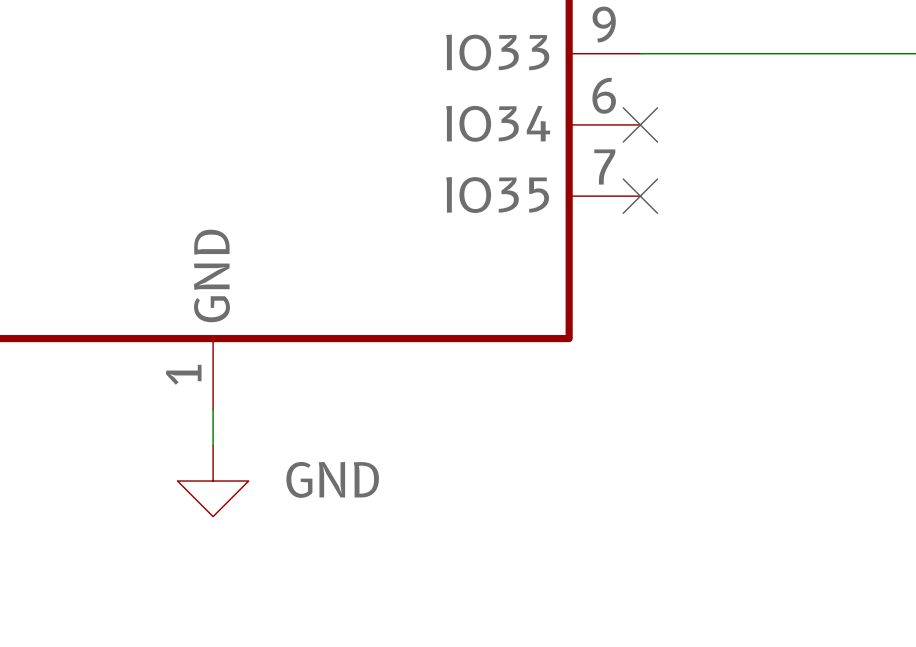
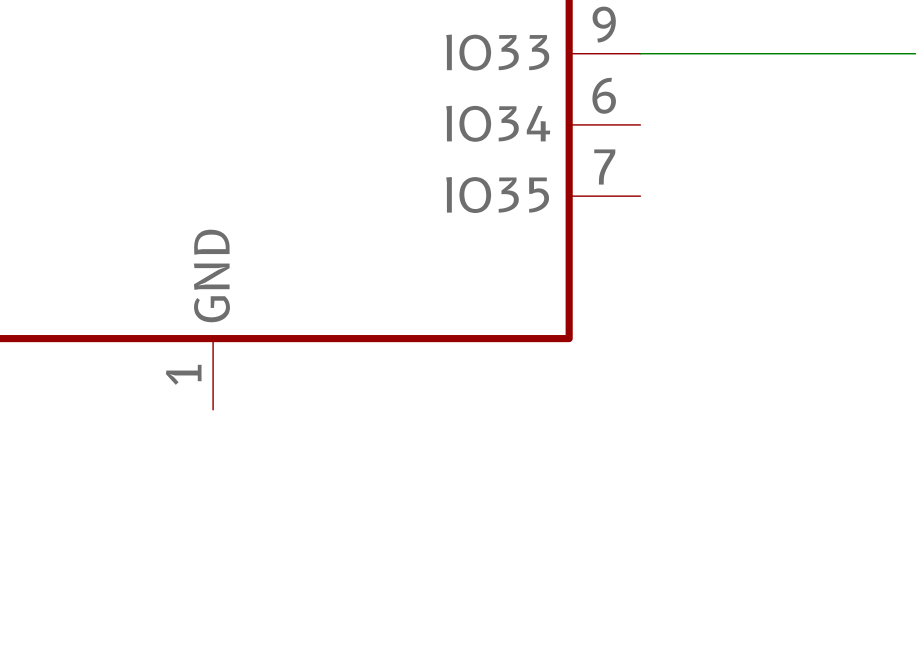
no-connect mark: (640, 124) -> none
no-connect mark: (640, 196) -> none
wire: (213, 409) (213, 445) -> none
power symbol: GND (213, 481) -> none

